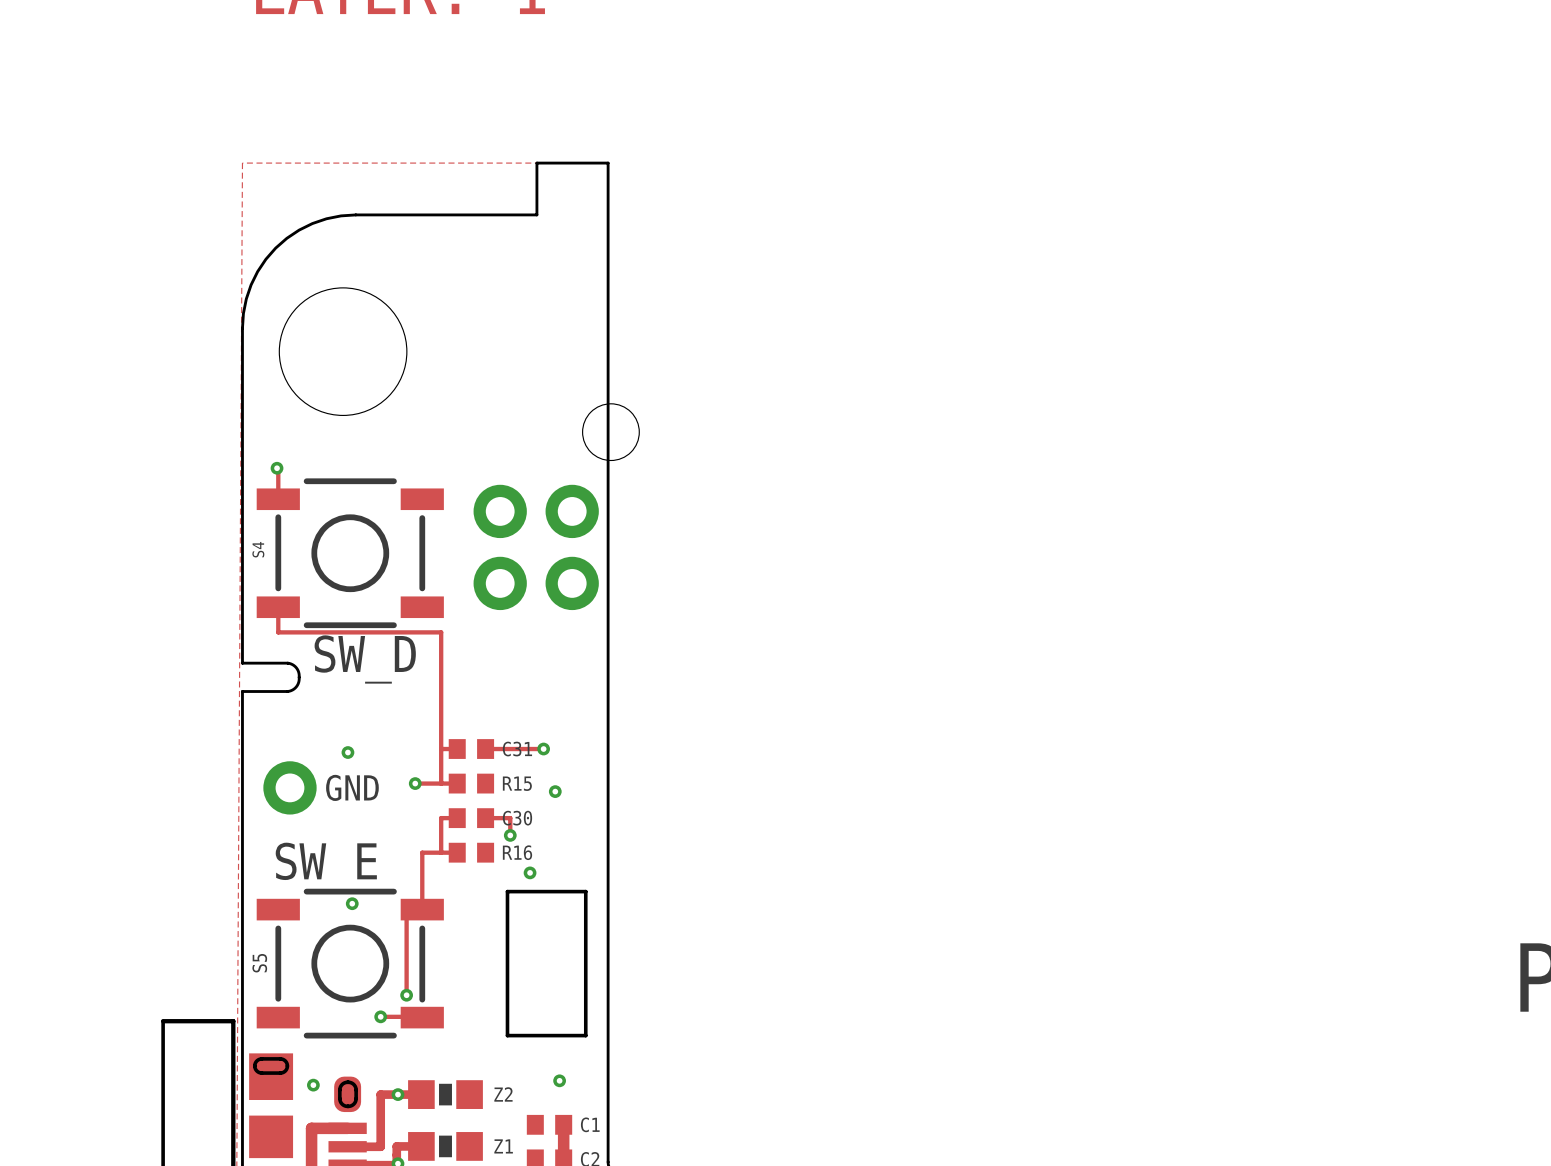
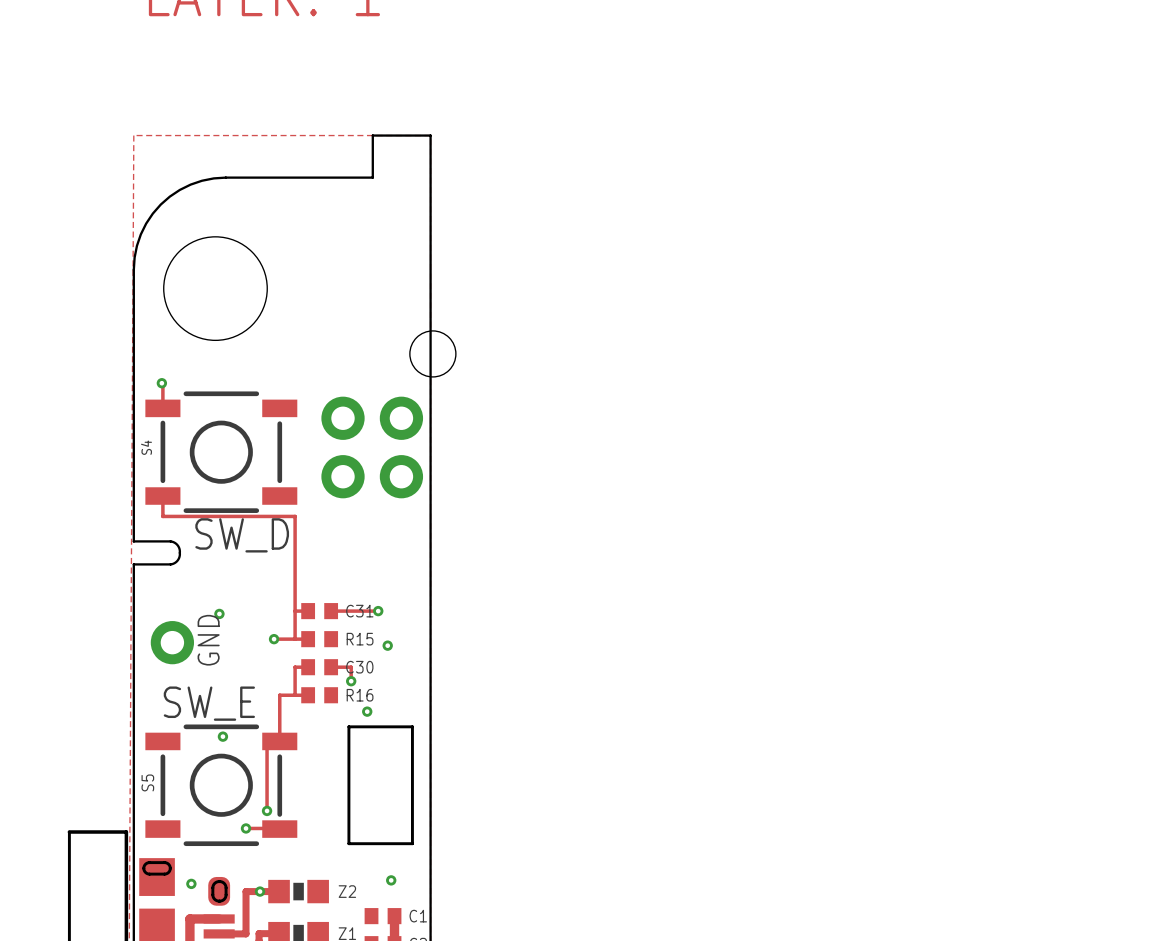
text rotation: 0° (352, 787) -> 90° counterclockwise (208, 640)

